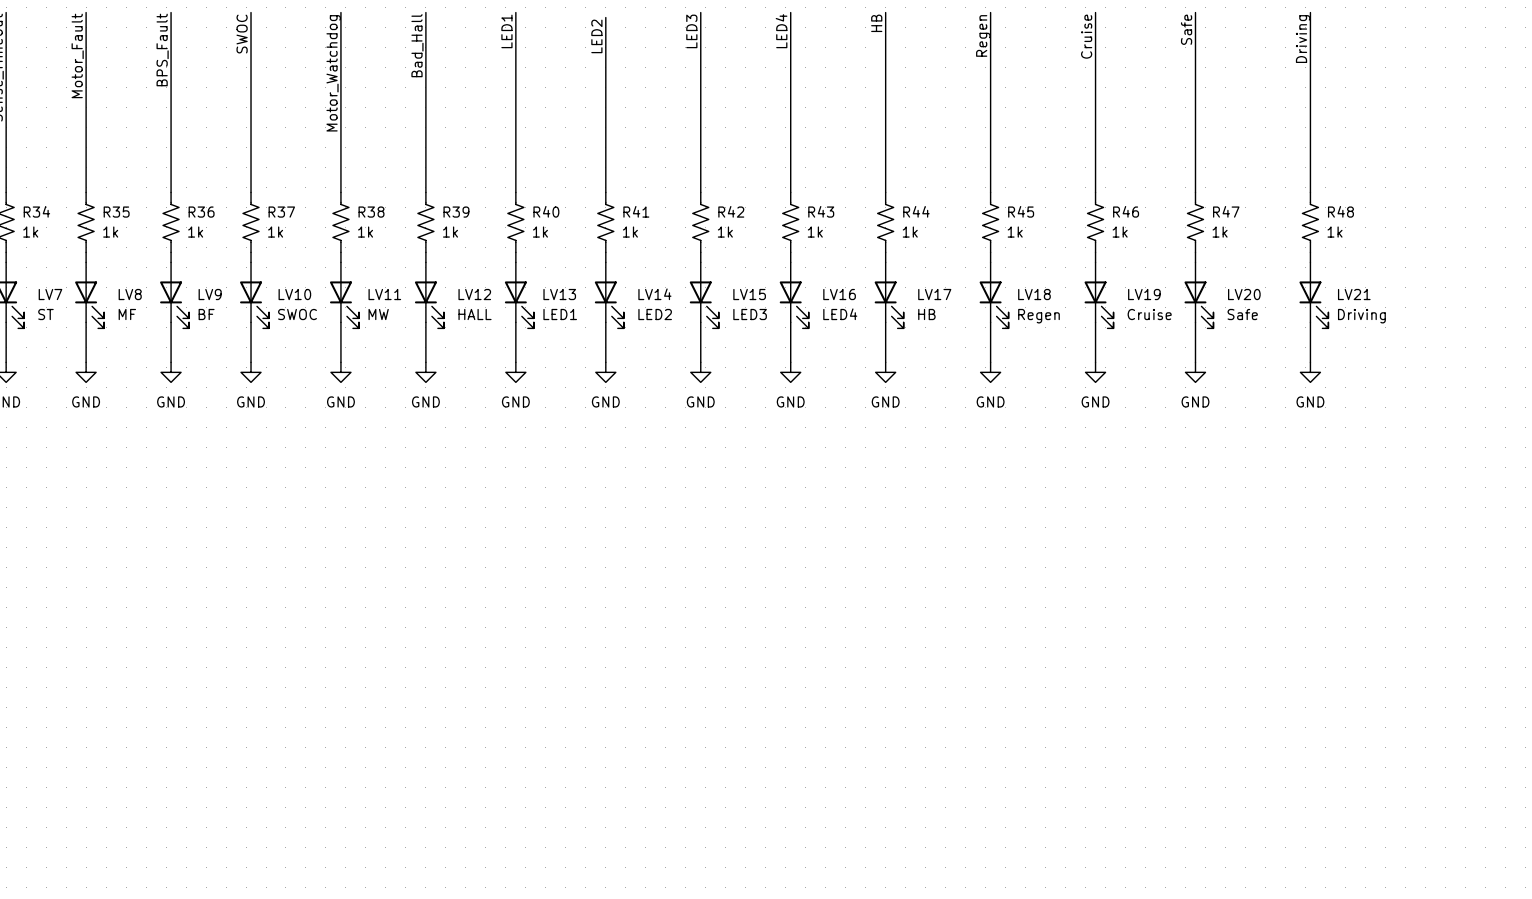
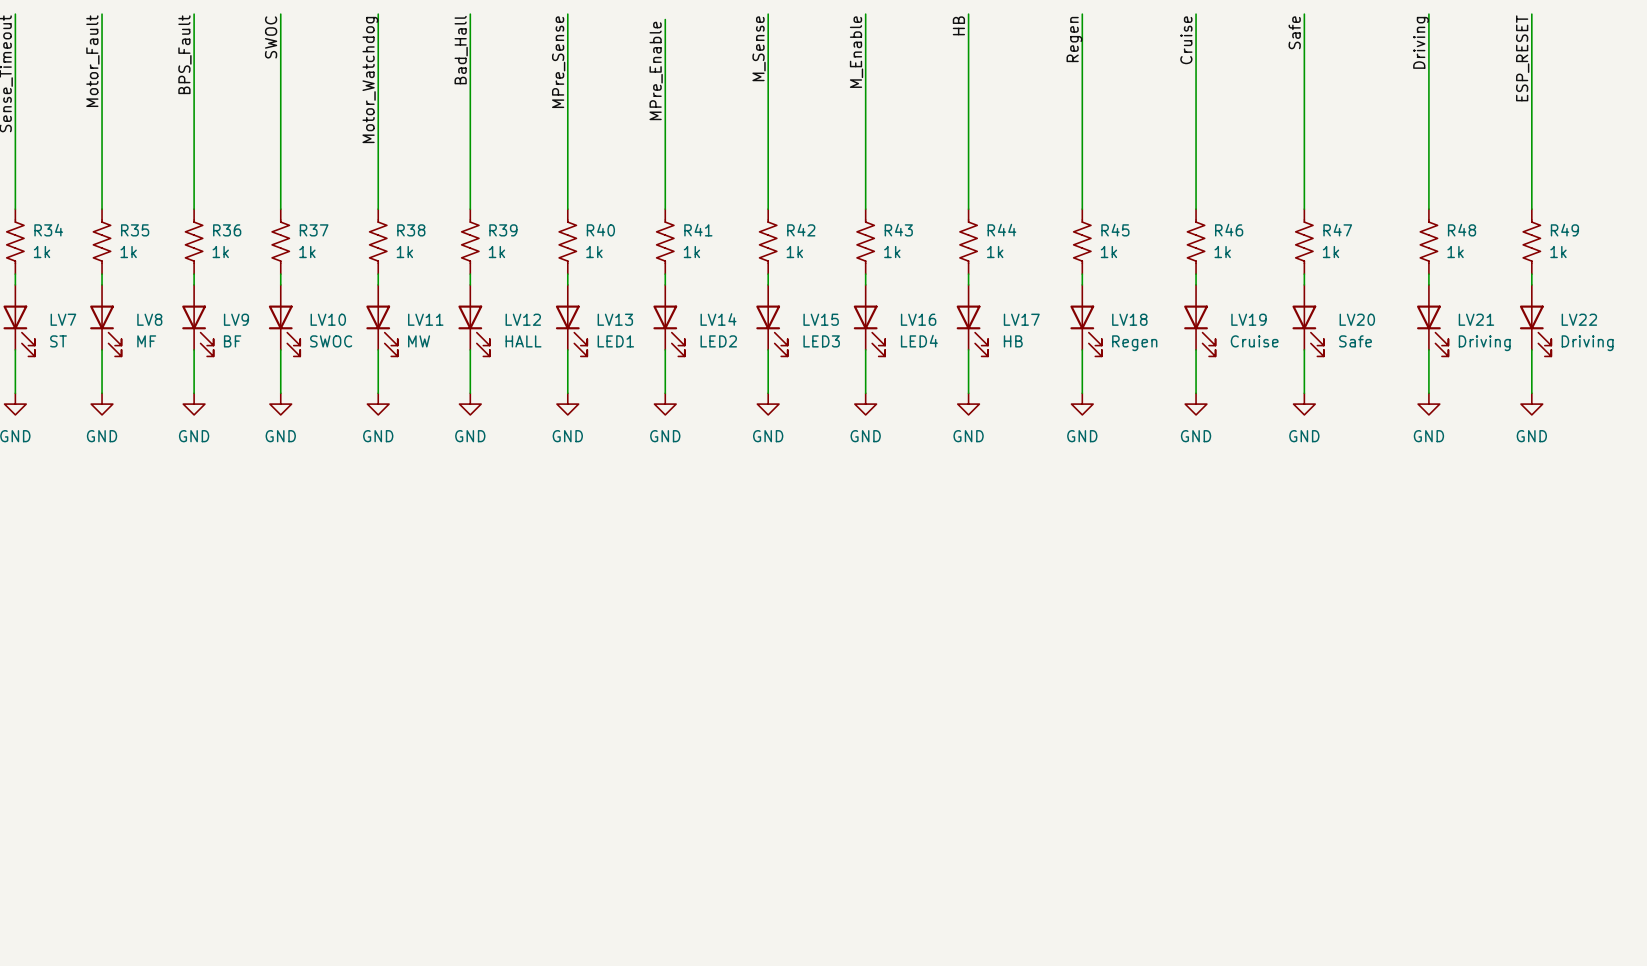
wire: none -> (1531, 14) (1531, 209)
label: LED1 (506, 31) -> MPre_Sense (558, 62)
label: LED3 (691, 31) -> M_Sense (759, 48)
label: LED4 (781, 31) -> M_Enable (856, 52)
label: LED2 (596, 36) -> MPre_Enable (656, 70)
label: none -> ESP_RESET (1522, 58)
R49: none -> 1k (1531, 241)
wire: none -> (1531, 274) (1531, 284)
LV22: none -> Driving (1535, 320)
wire: none -> (1531, 349) (1531, 393)
power symbol: none -> GND (1531, 404)

